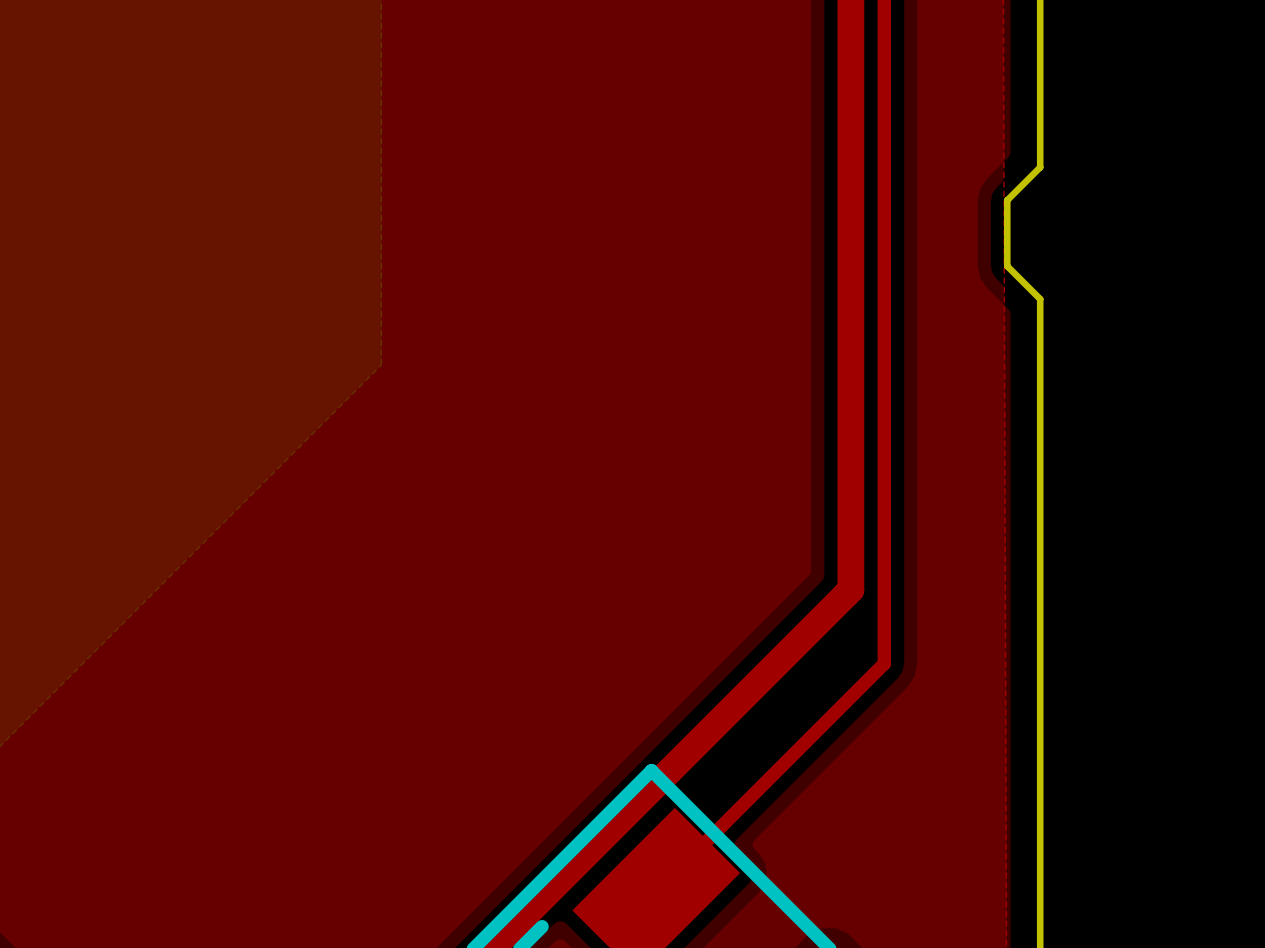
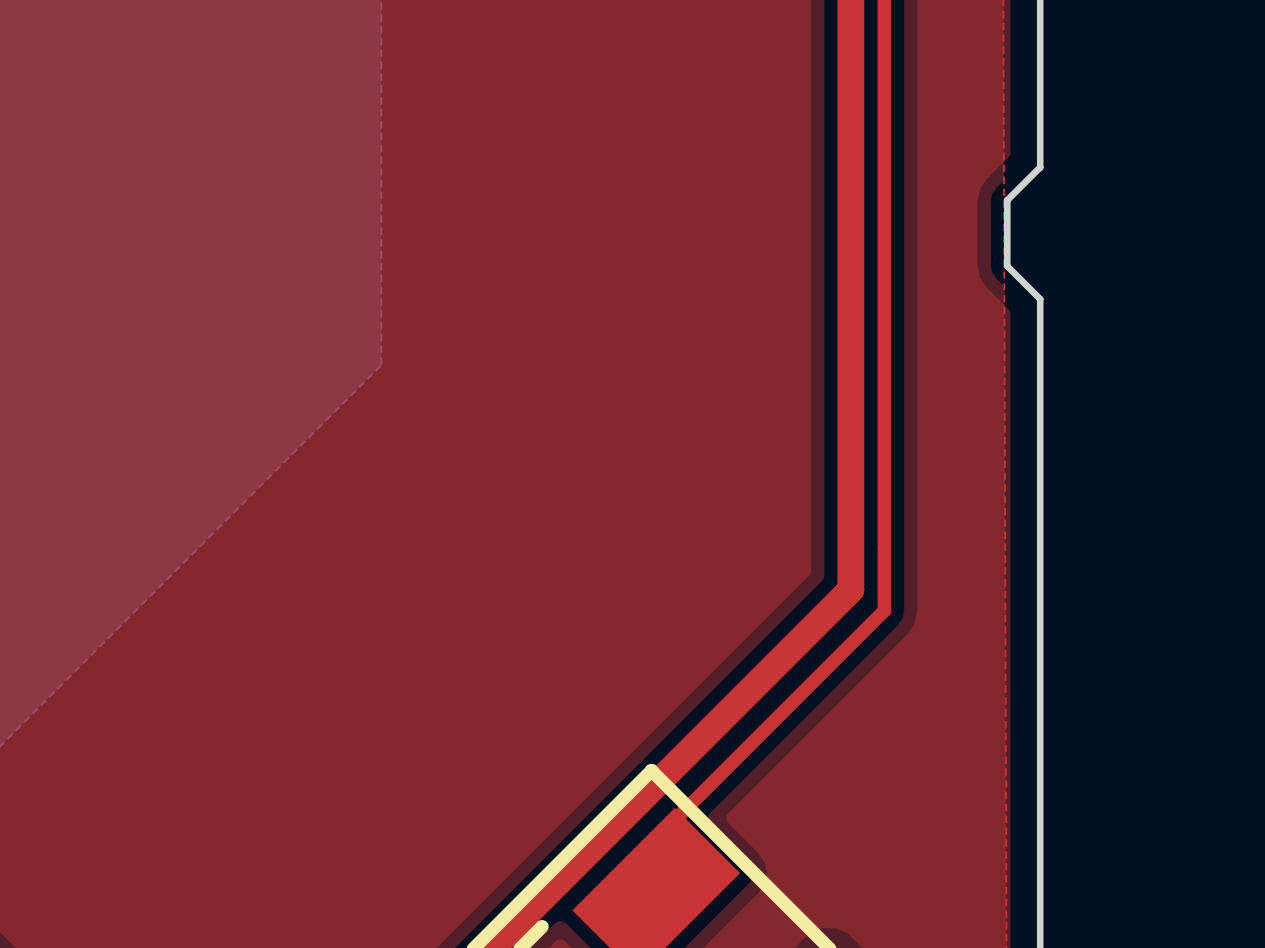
top track: (884, 610) (884, 663) (656, 891) -> (884, 610) (656, 838) (656, 891)

